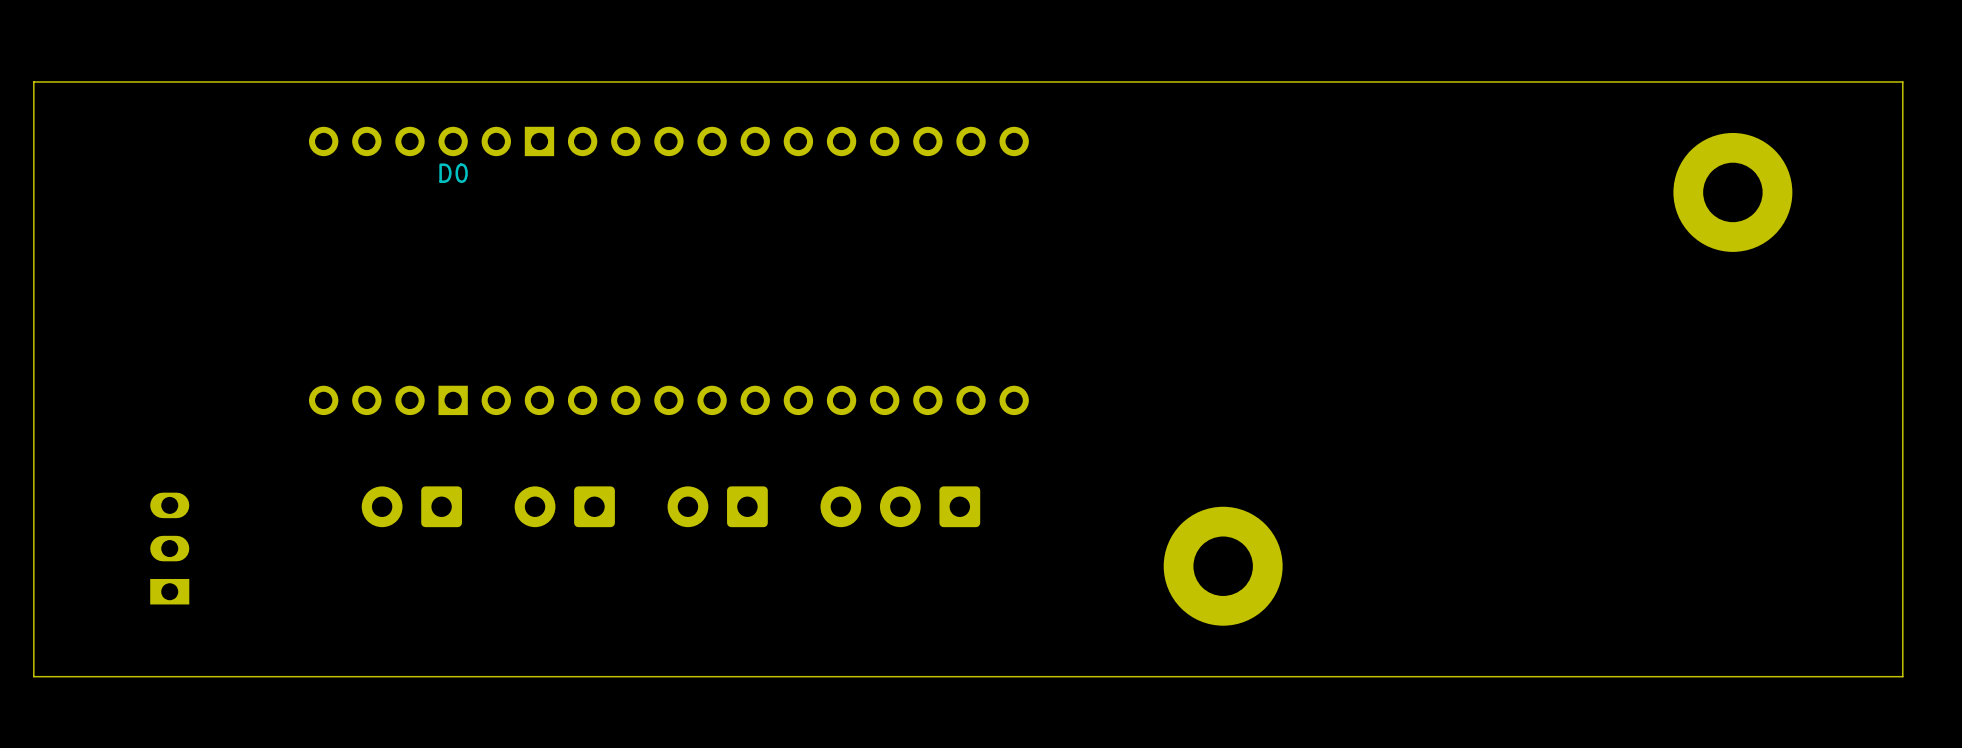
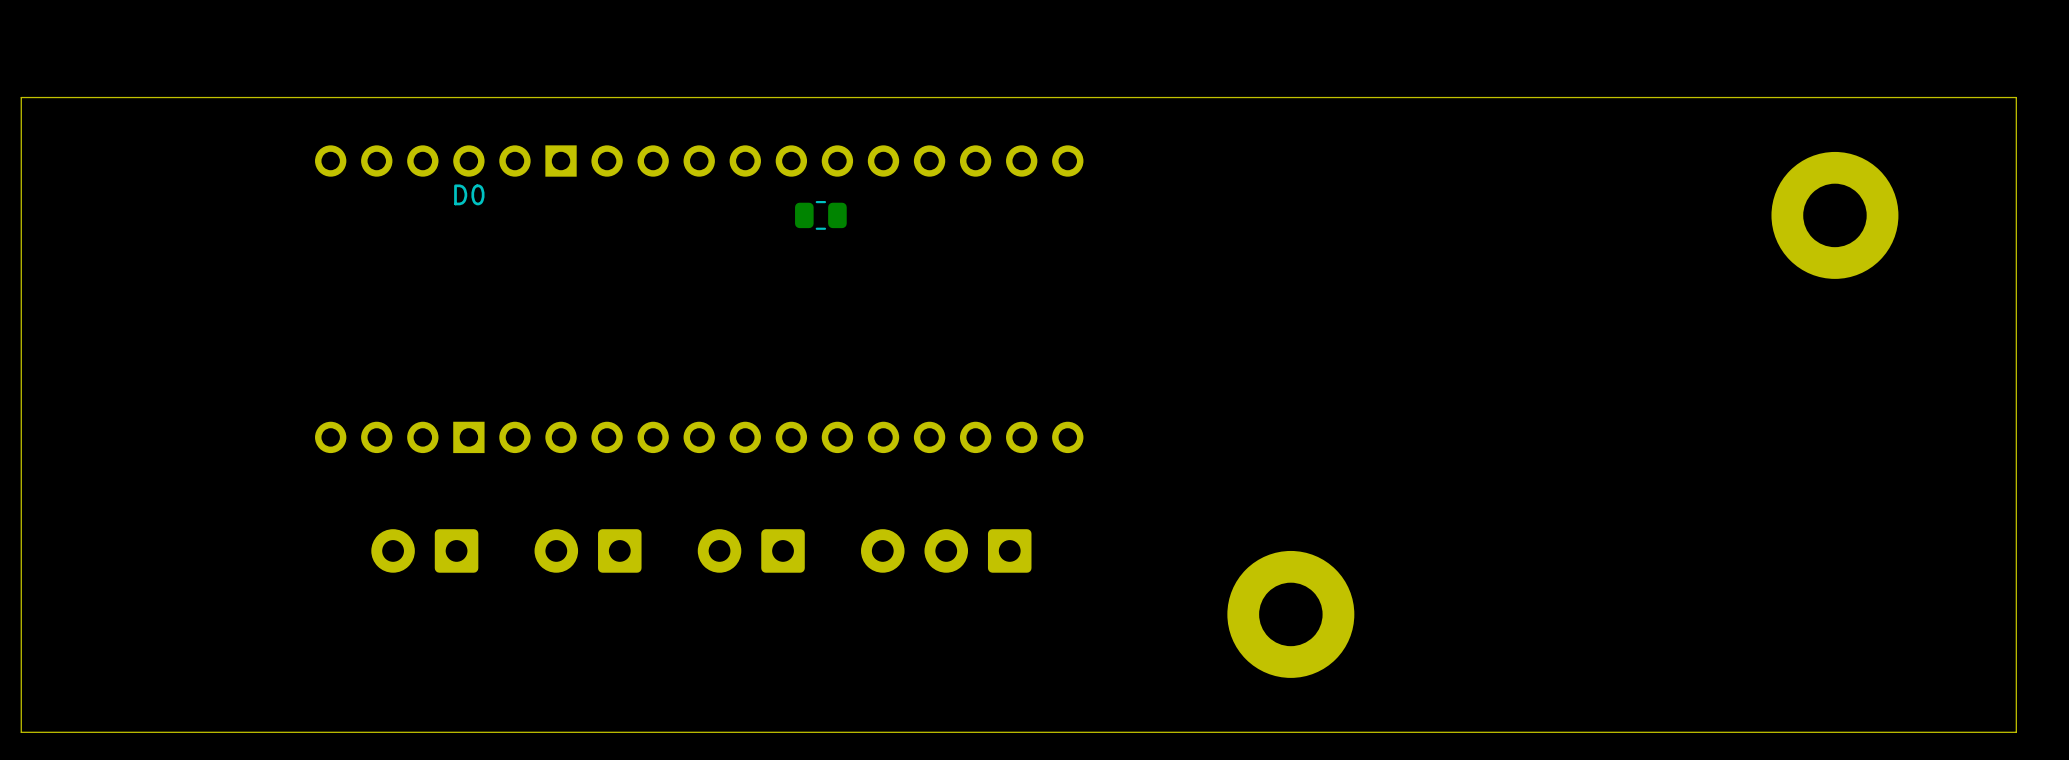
part: none -> (820, 215)
part: (169, 548) -> none

